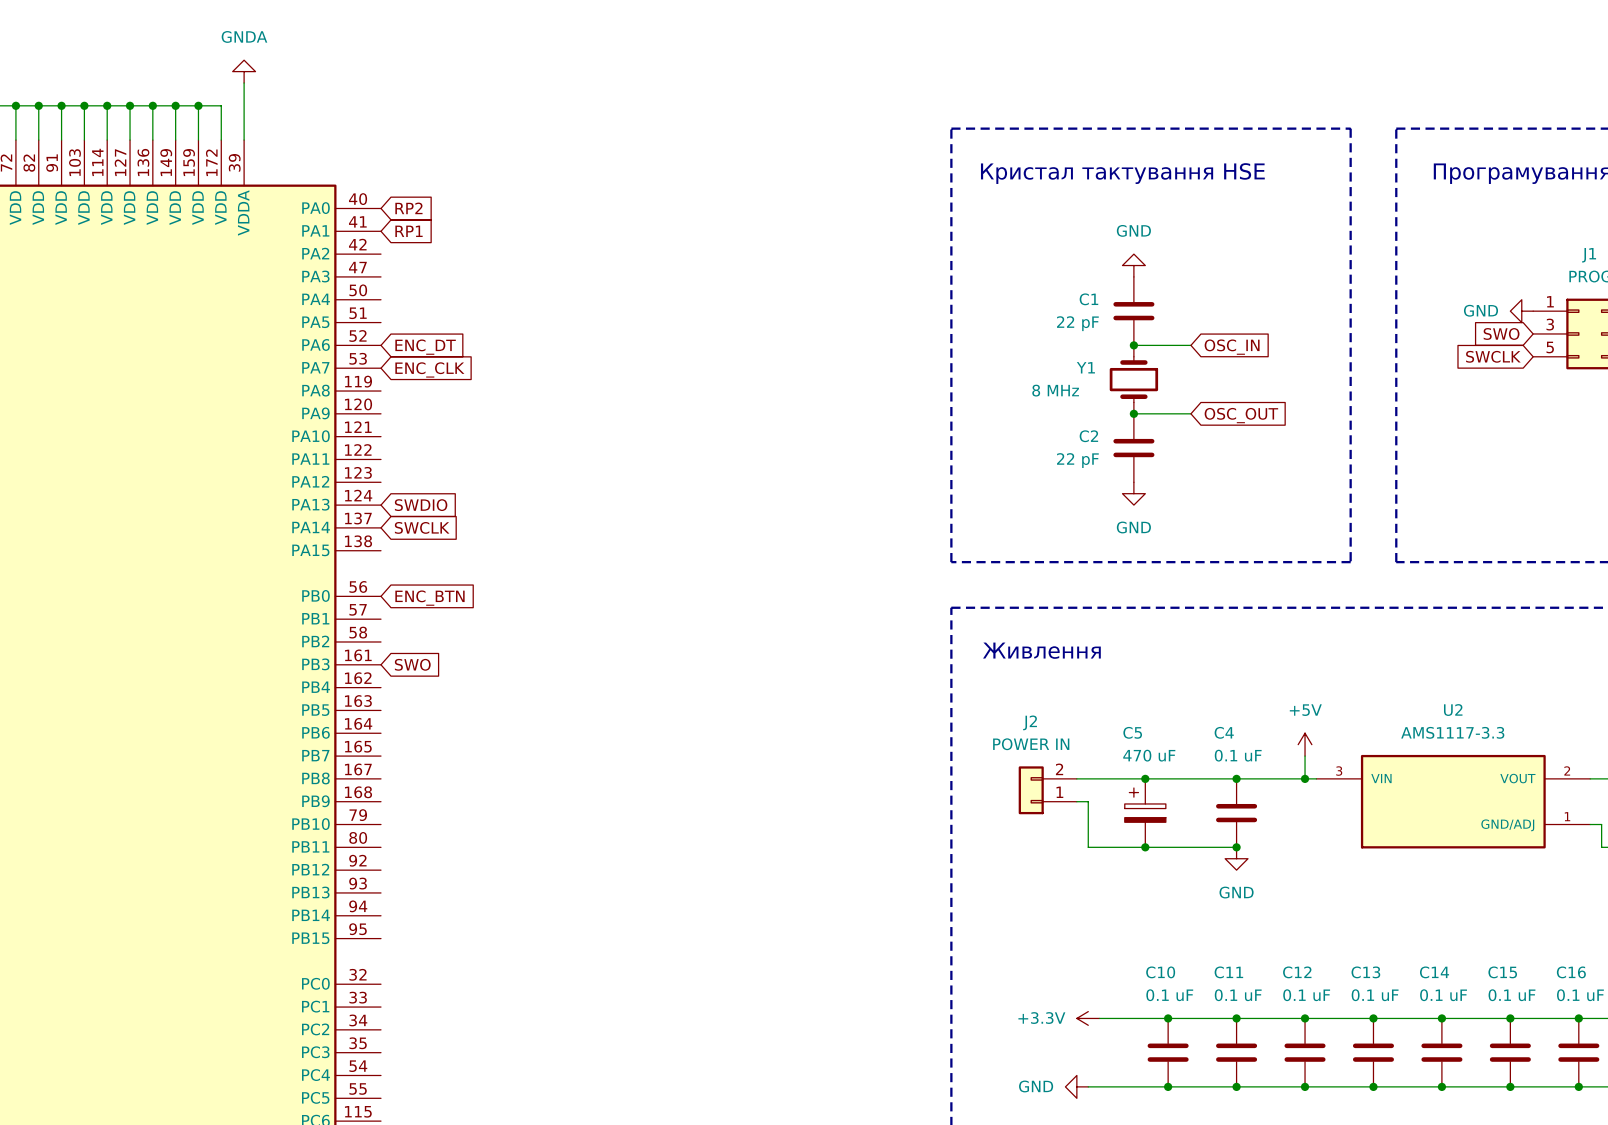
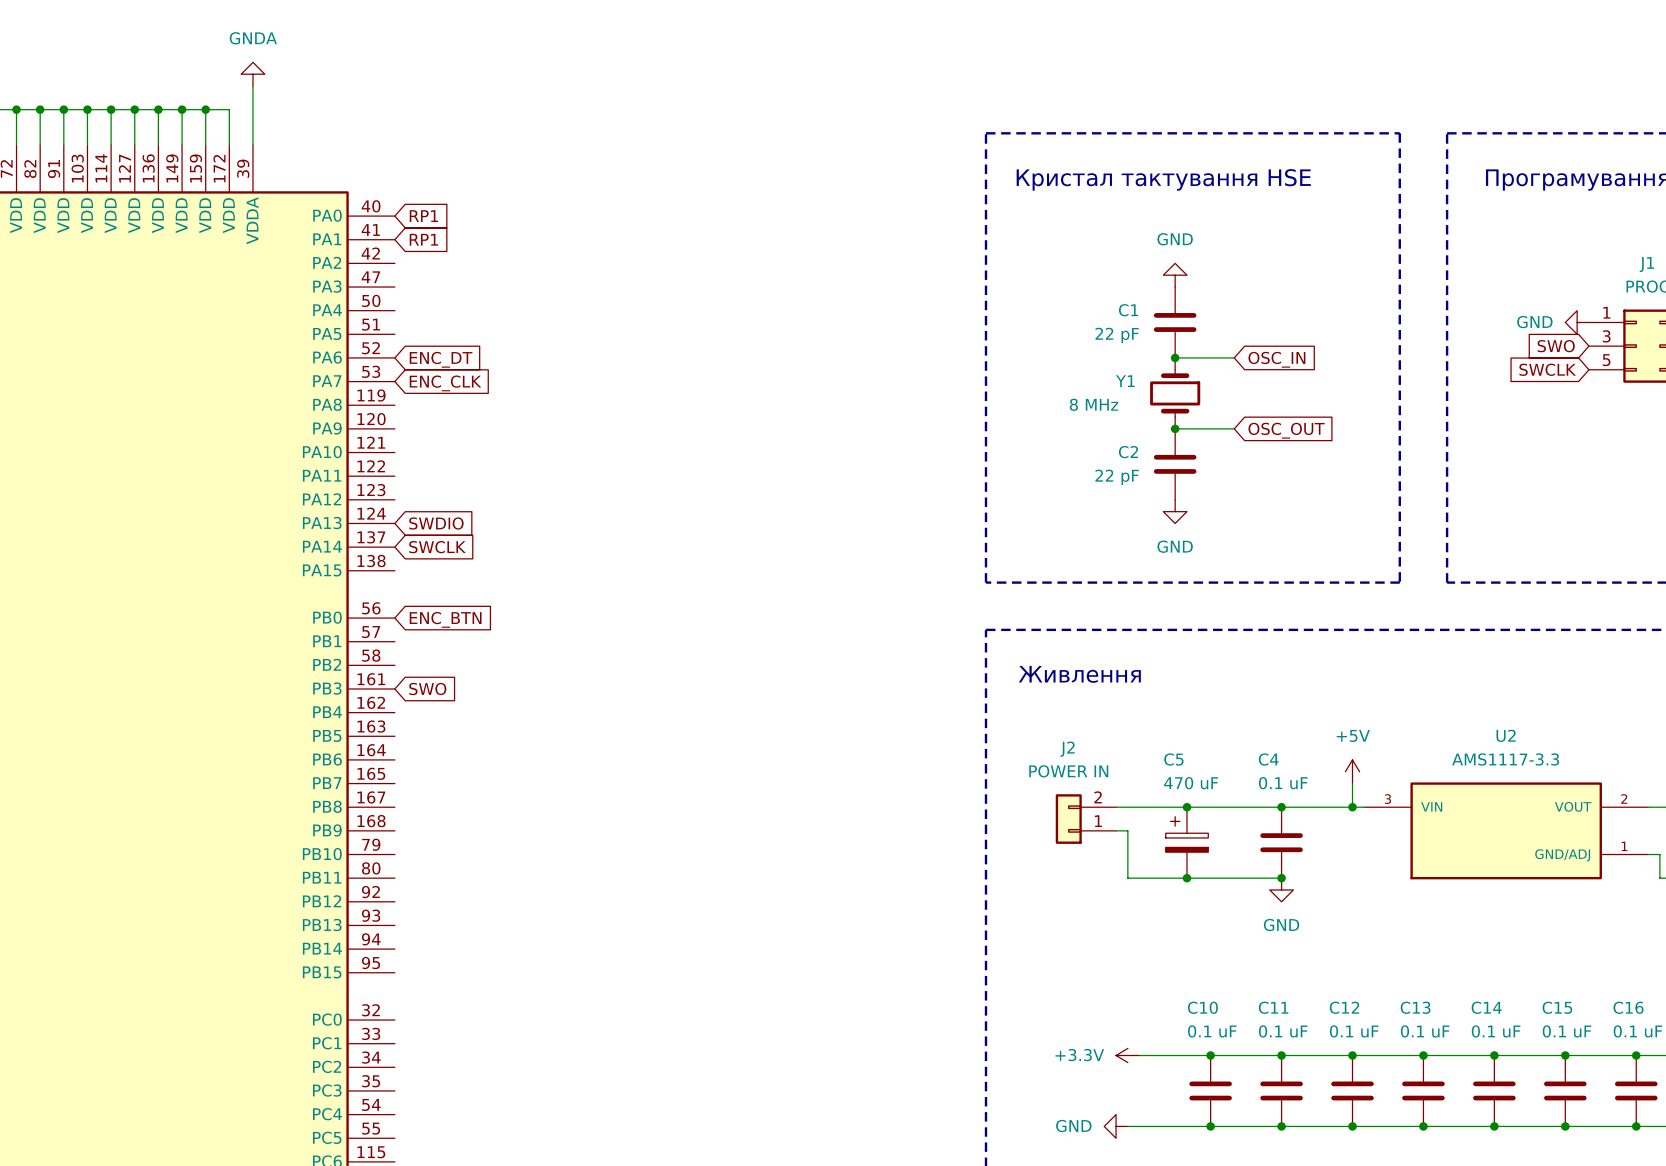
global label: RP2 (408, 208) -> RP1 (423, 216)

